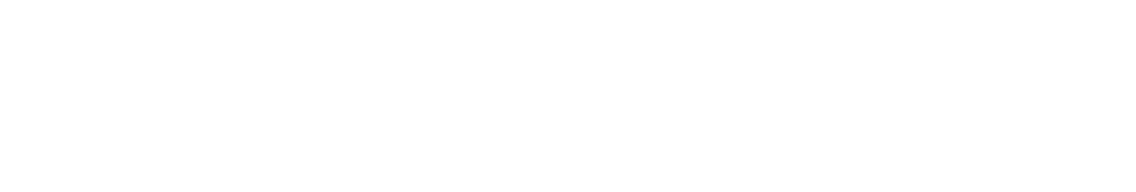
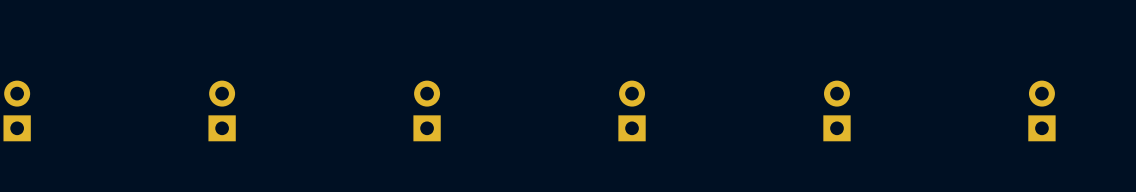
part: none -> (17, 110)
part: none -> (222, 110)
part: none -> (427, 110)
part: none -> (632, 110)
part: none -> (836, 110)
part: none -> (1041, 110)

